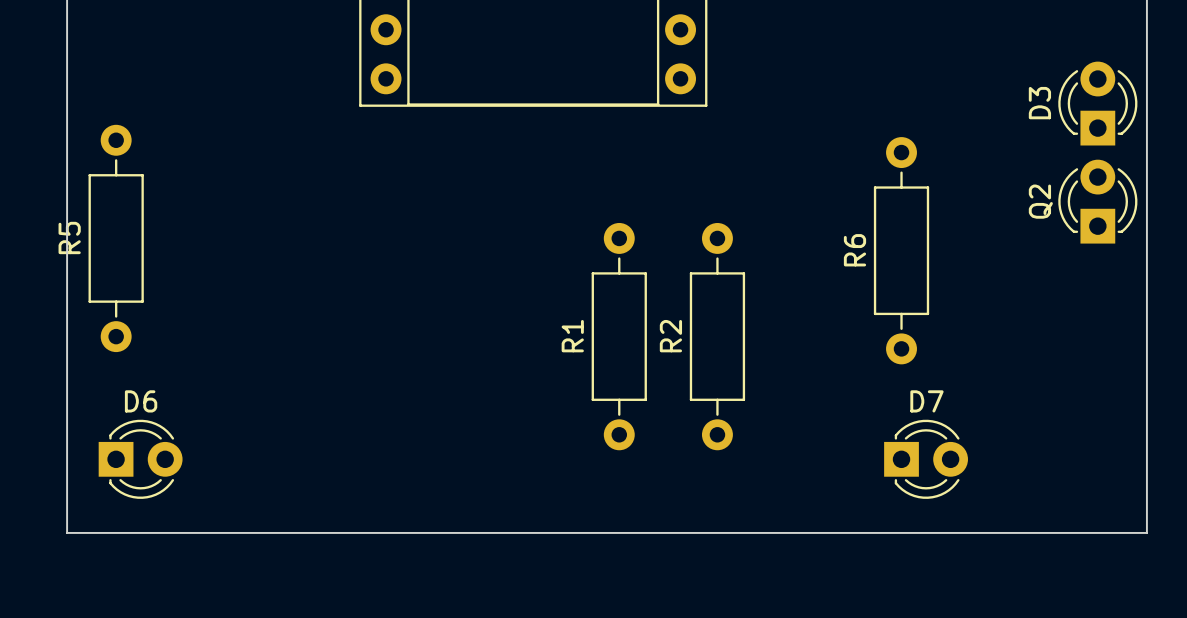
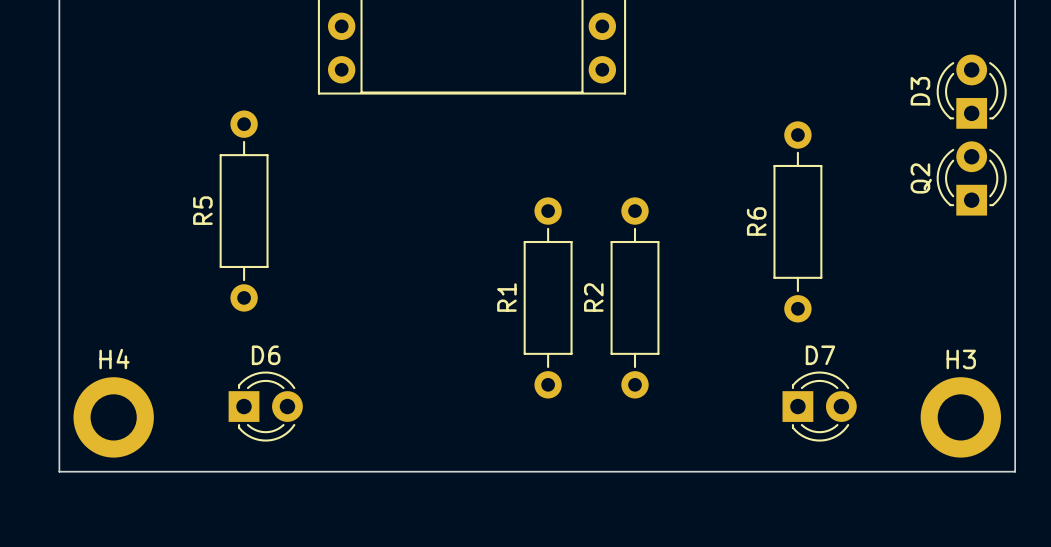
R5 position: (116, 238) -> (244, 211)
D6 position: (140, 459) -> (265, 406)
H4: none -> (113, 417)
H3: none -> (960, 417)

